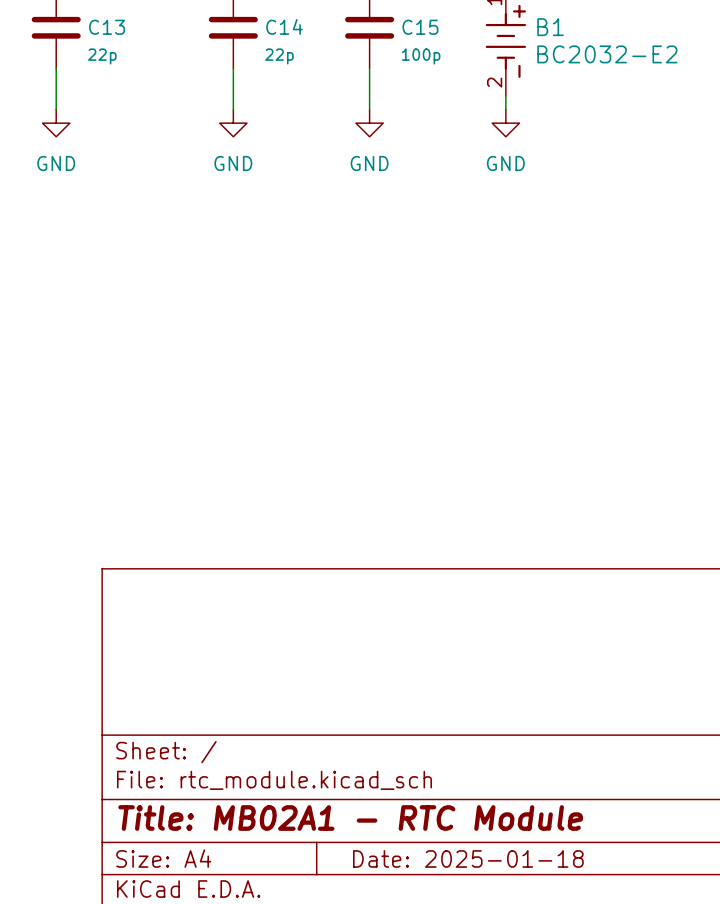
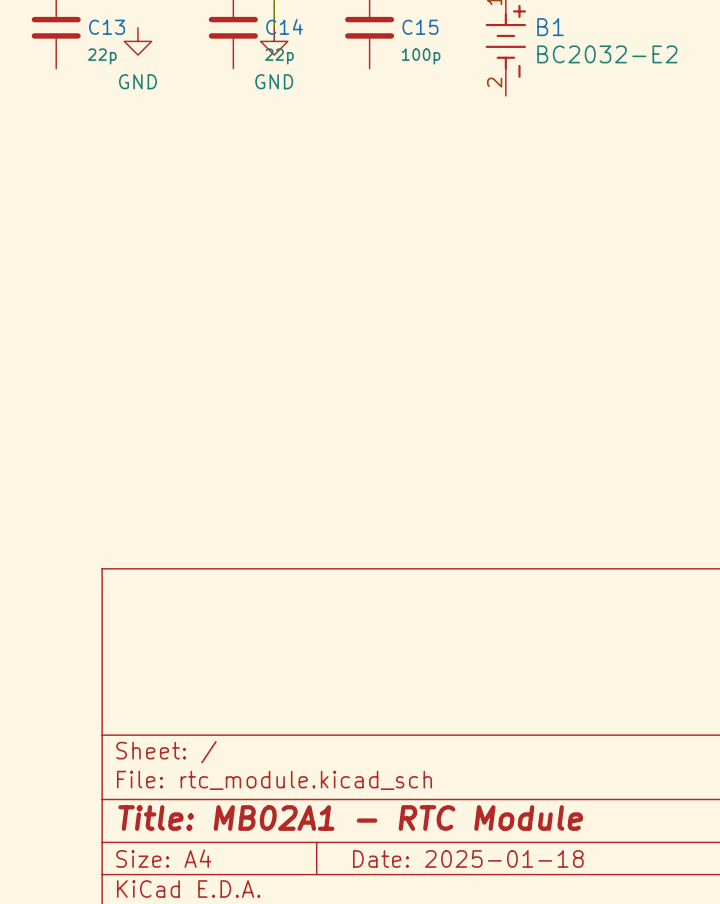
wire: none -> (274, 0) (274, 27)
power symbol: none -> GND (137, 41)
power symbol: none -> GND (274, 41)
wire: (56, 68) (56, 109) -> none
wire: (233, 68) (233, 109) -> none
wire: (369, 68) (369, 109) -> none
wire: (505, 95) (505, 109) -> none
power symbol: GND (56, 123) -> none
power symbol: GND (233, 123) -> none
power symbol: GND (369, 123) -> none
power symbol: GND (505, 123) -> none

